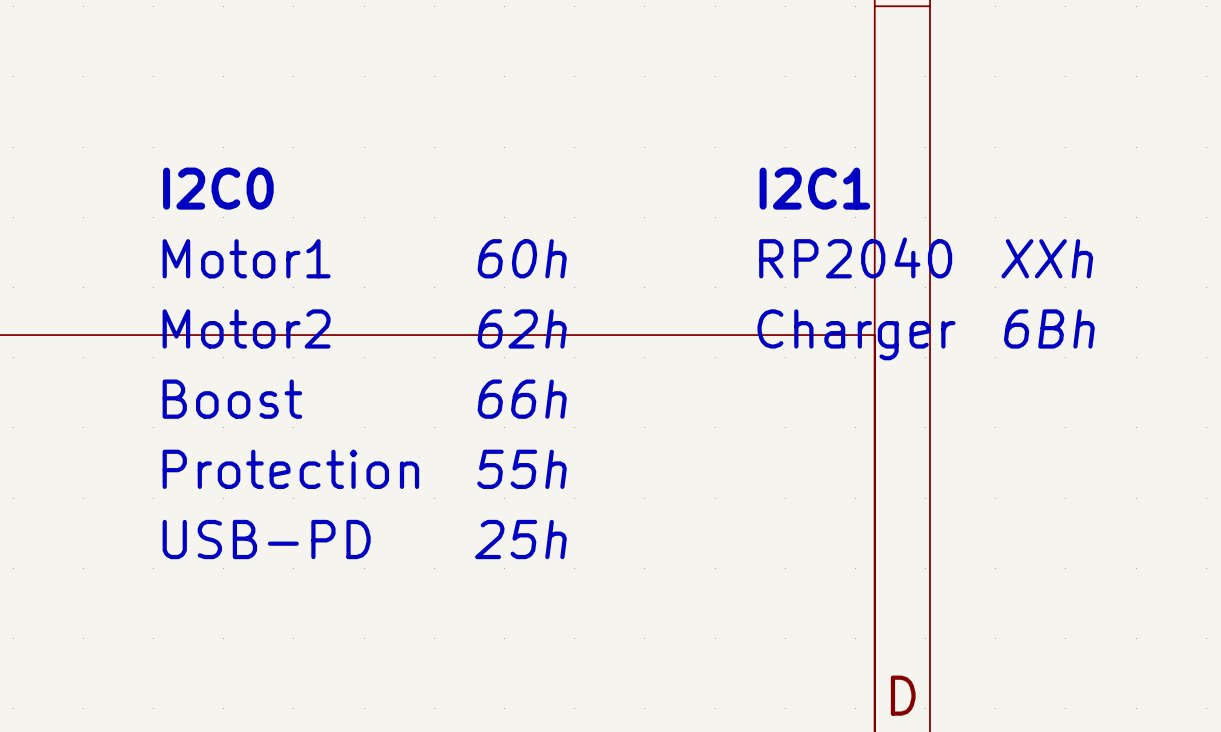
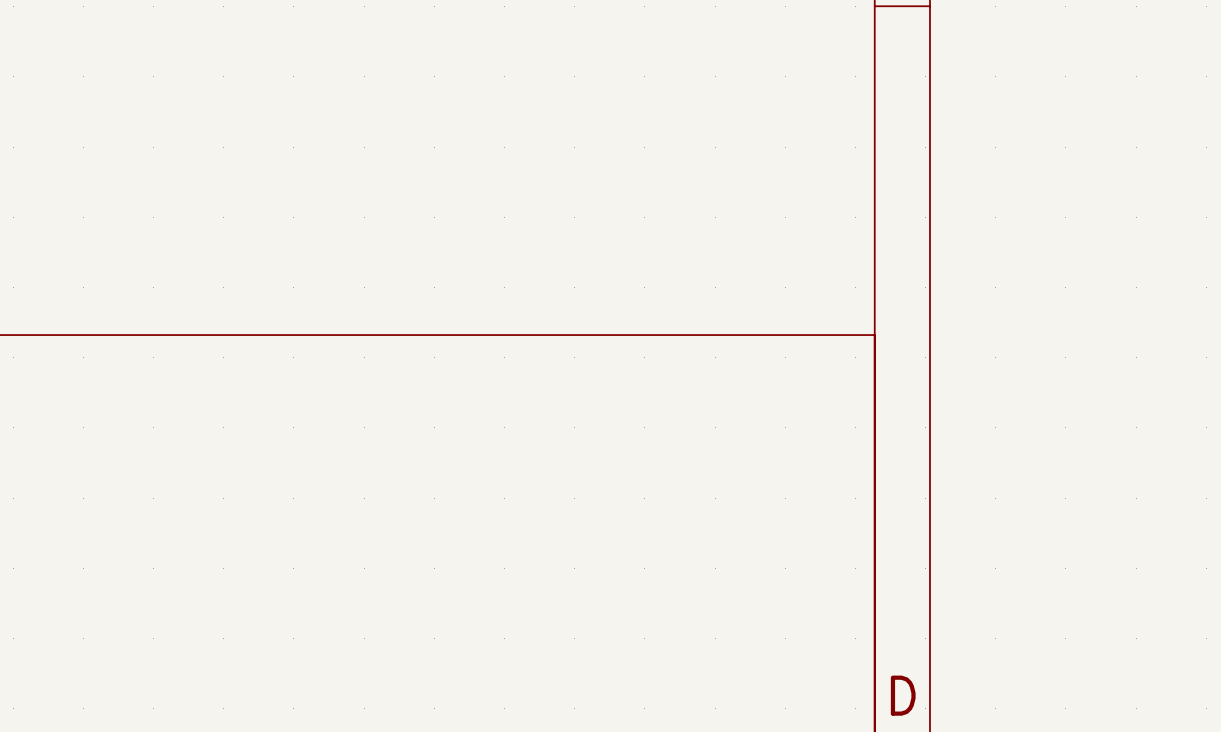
text: I2C0 (218, 188) -> none
text: I2C1 (814, 188) -> none
text: RP2040 (855, 257) -> none
text: Motor1 (246, 258) -> none
text: 60h (522, 258) -> none
text: XXh (1047, 258) -> none
text: Motor2 (246, 328) -> none
text: 62h (522, 328) -> none
text: 6Bh (1049, 328) -> none
text: Charger (856, 334) -> none
text: Boost (232, 399) -> none
text: 66h (522, 399) -> none
text: Protection (290, 469) -> none
text: 55h (521, 469) -> none
text: USB-PD (266, 539) -> none
text: 25h (520, 539) -> none

